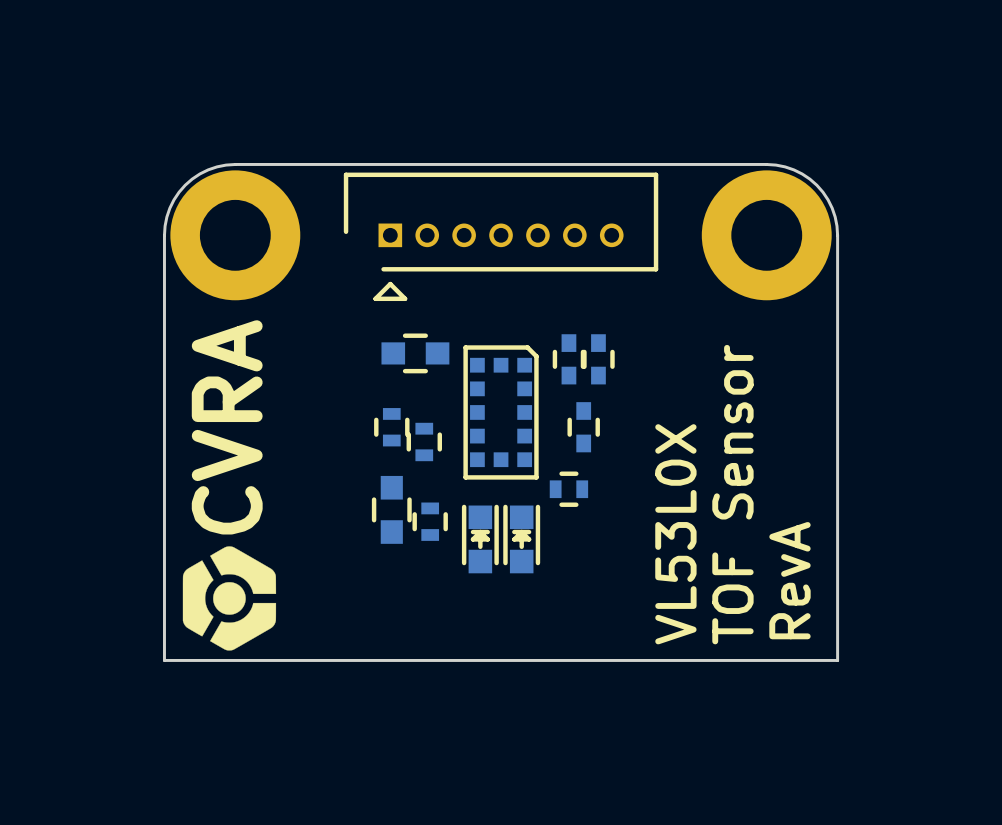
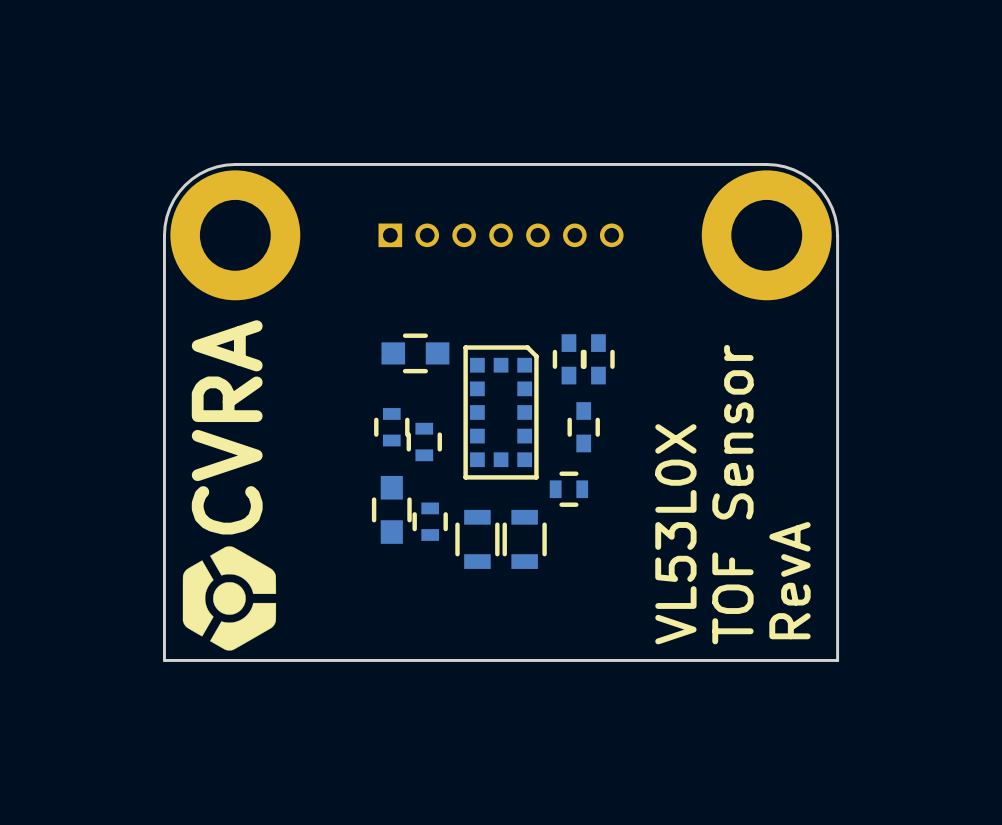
part side: bottom (501, 236) -> top (501, 235)
part footprint: [461, 504, 499, 574] -> [455, 509, 500, 569]
part footprint: [503, 504, 541, 574] -> [502, 509, 547, 569]

